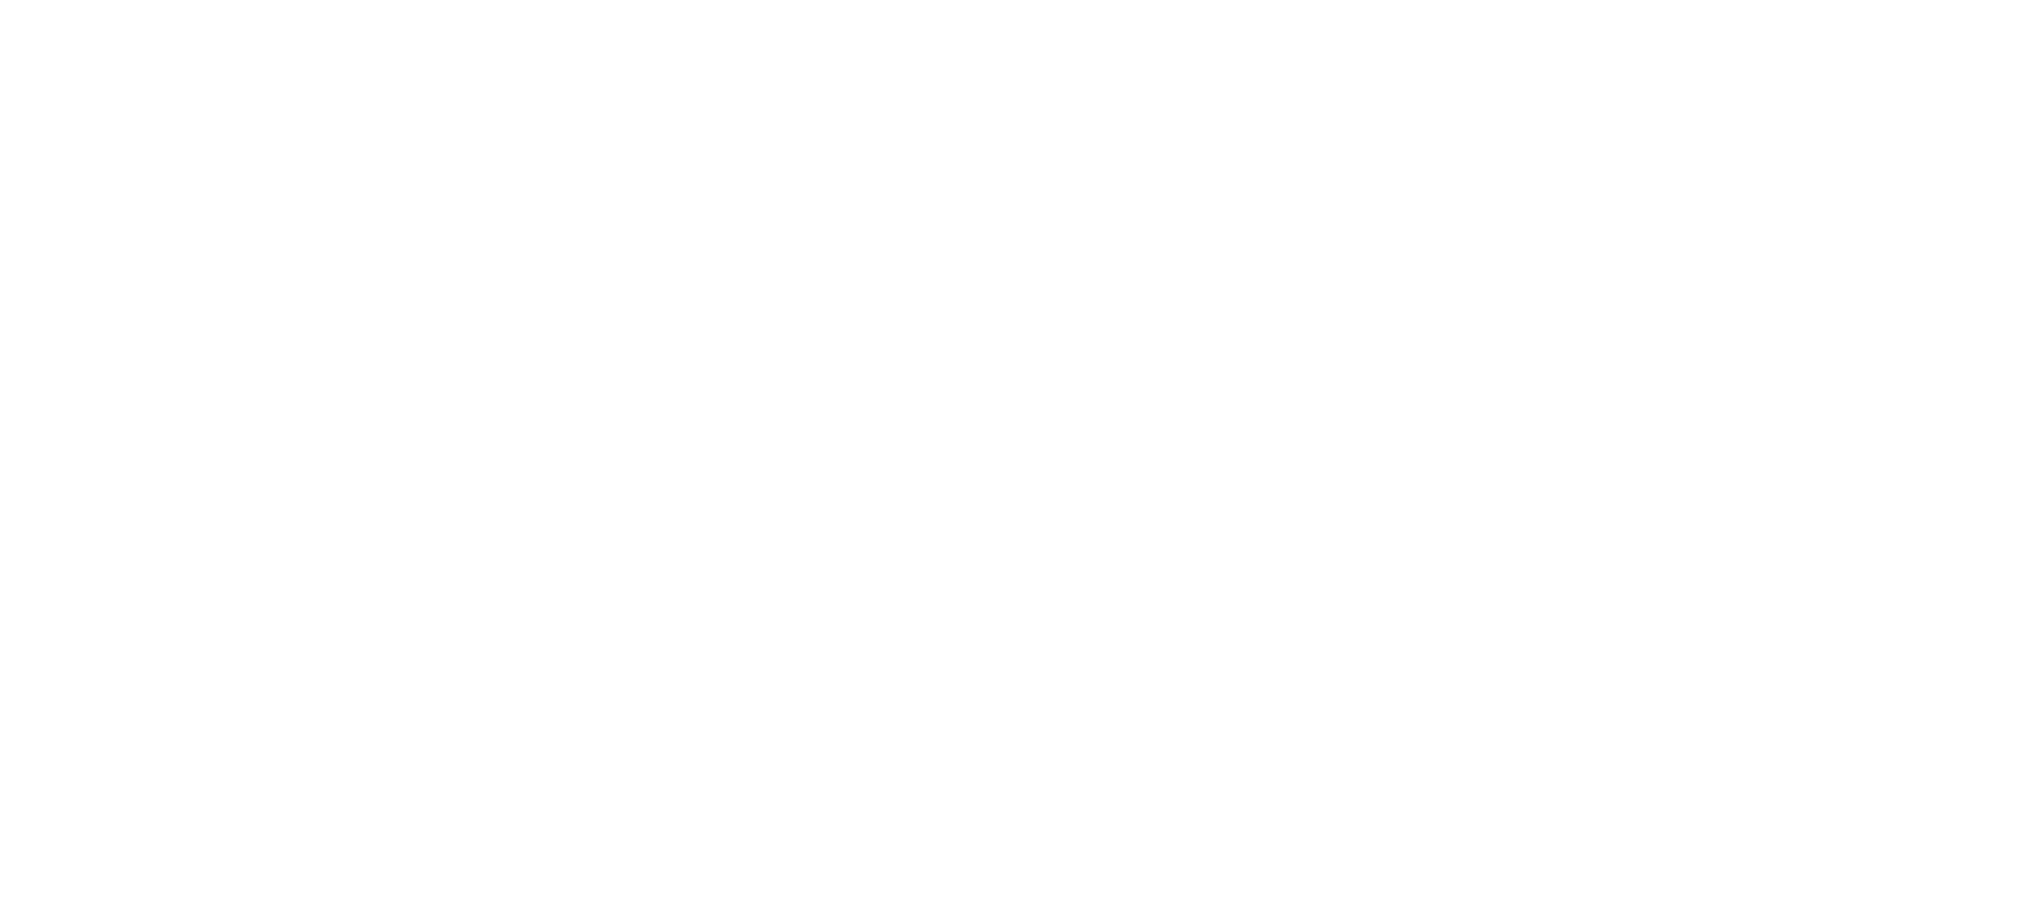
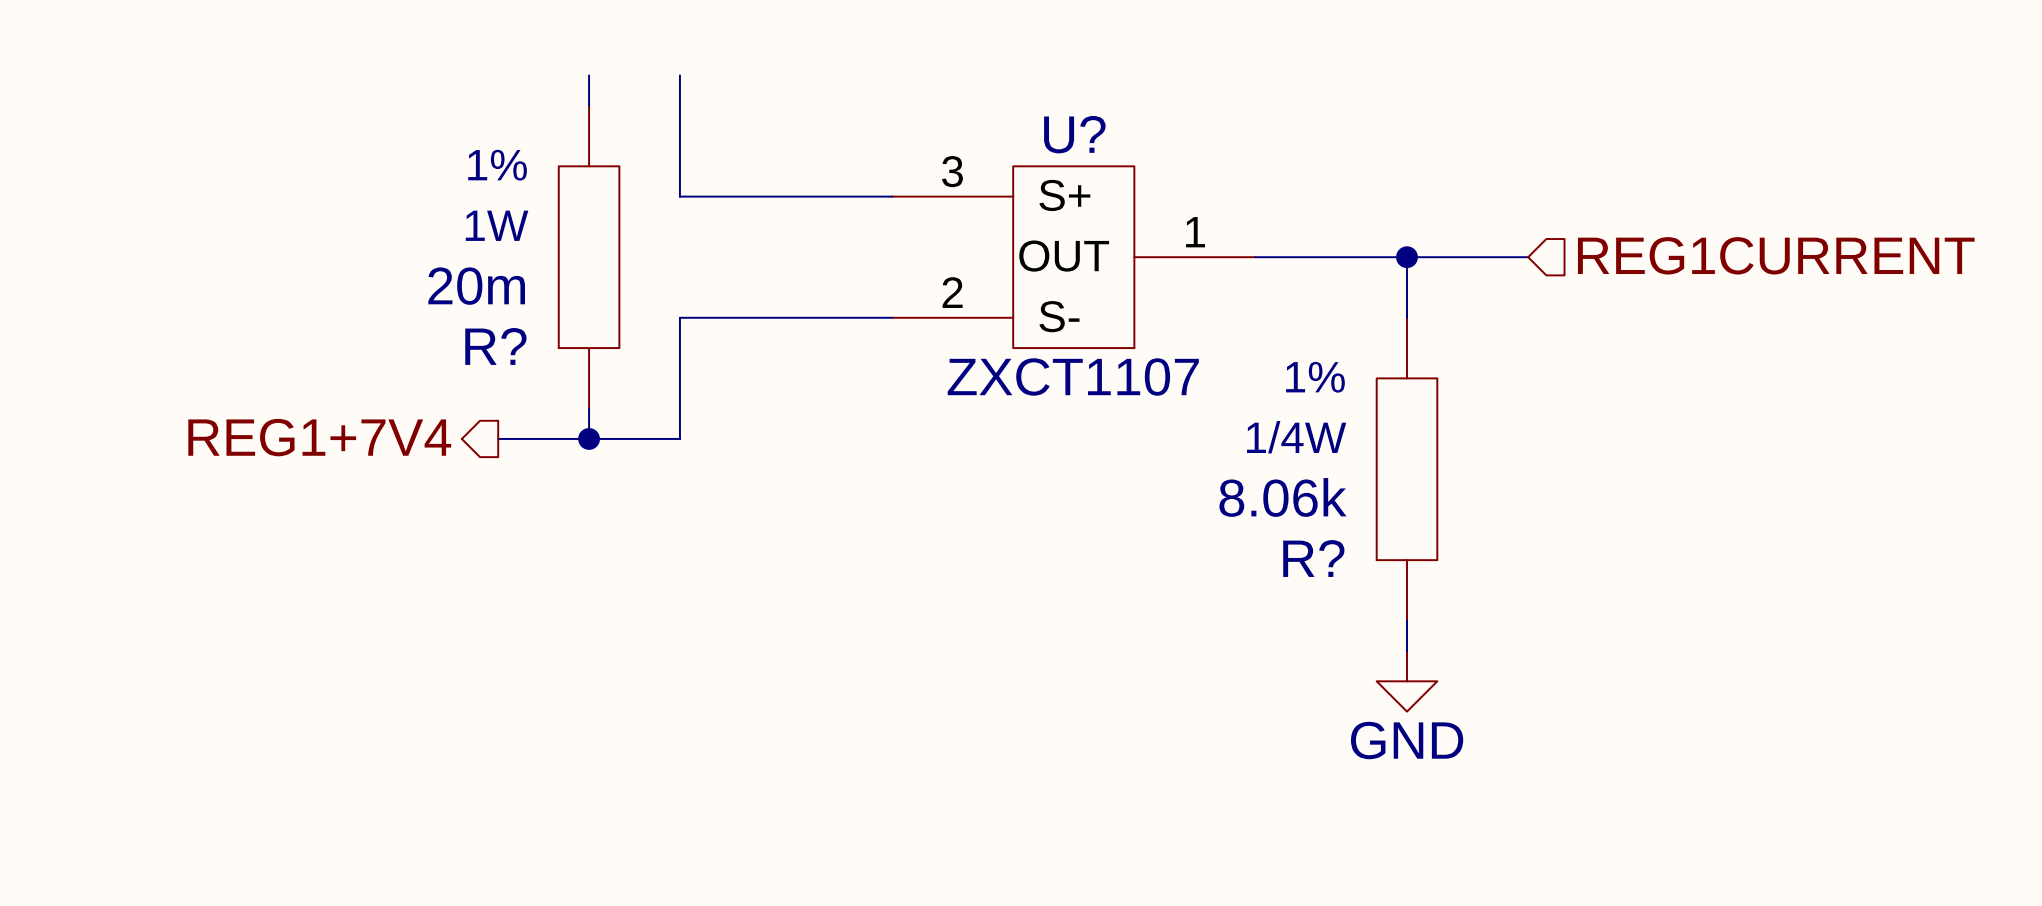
wire: none -> (589, 75) (589, 105)
wire: none -> (679, 75) (679, 196) (892, 196)
hierarchical label: none -> REG1CURRENT (1776, 255)
R?: none -> 20m (589, 257)
U?: none -> ZXCT1107 (1073, 257)
wire: none -> (1255, 257) (1528, 257)
wire: none -> (1407, 257) (1407, 317)
junction: none -> (1407, 257)
wire: none -> (892, 317) (679, 317) (679, 438) (498, 438)
wire: none -> (589, 408) (589, 438)
hierarchical label: none -> REG1+7V4 (319, 437)
junction: none -> (589, 438)
R?: none -> 8.06k (1407, 469)
wire: none -> (1407, 620) (1407, 651)
power symbol: none -> GND (1407, 681)

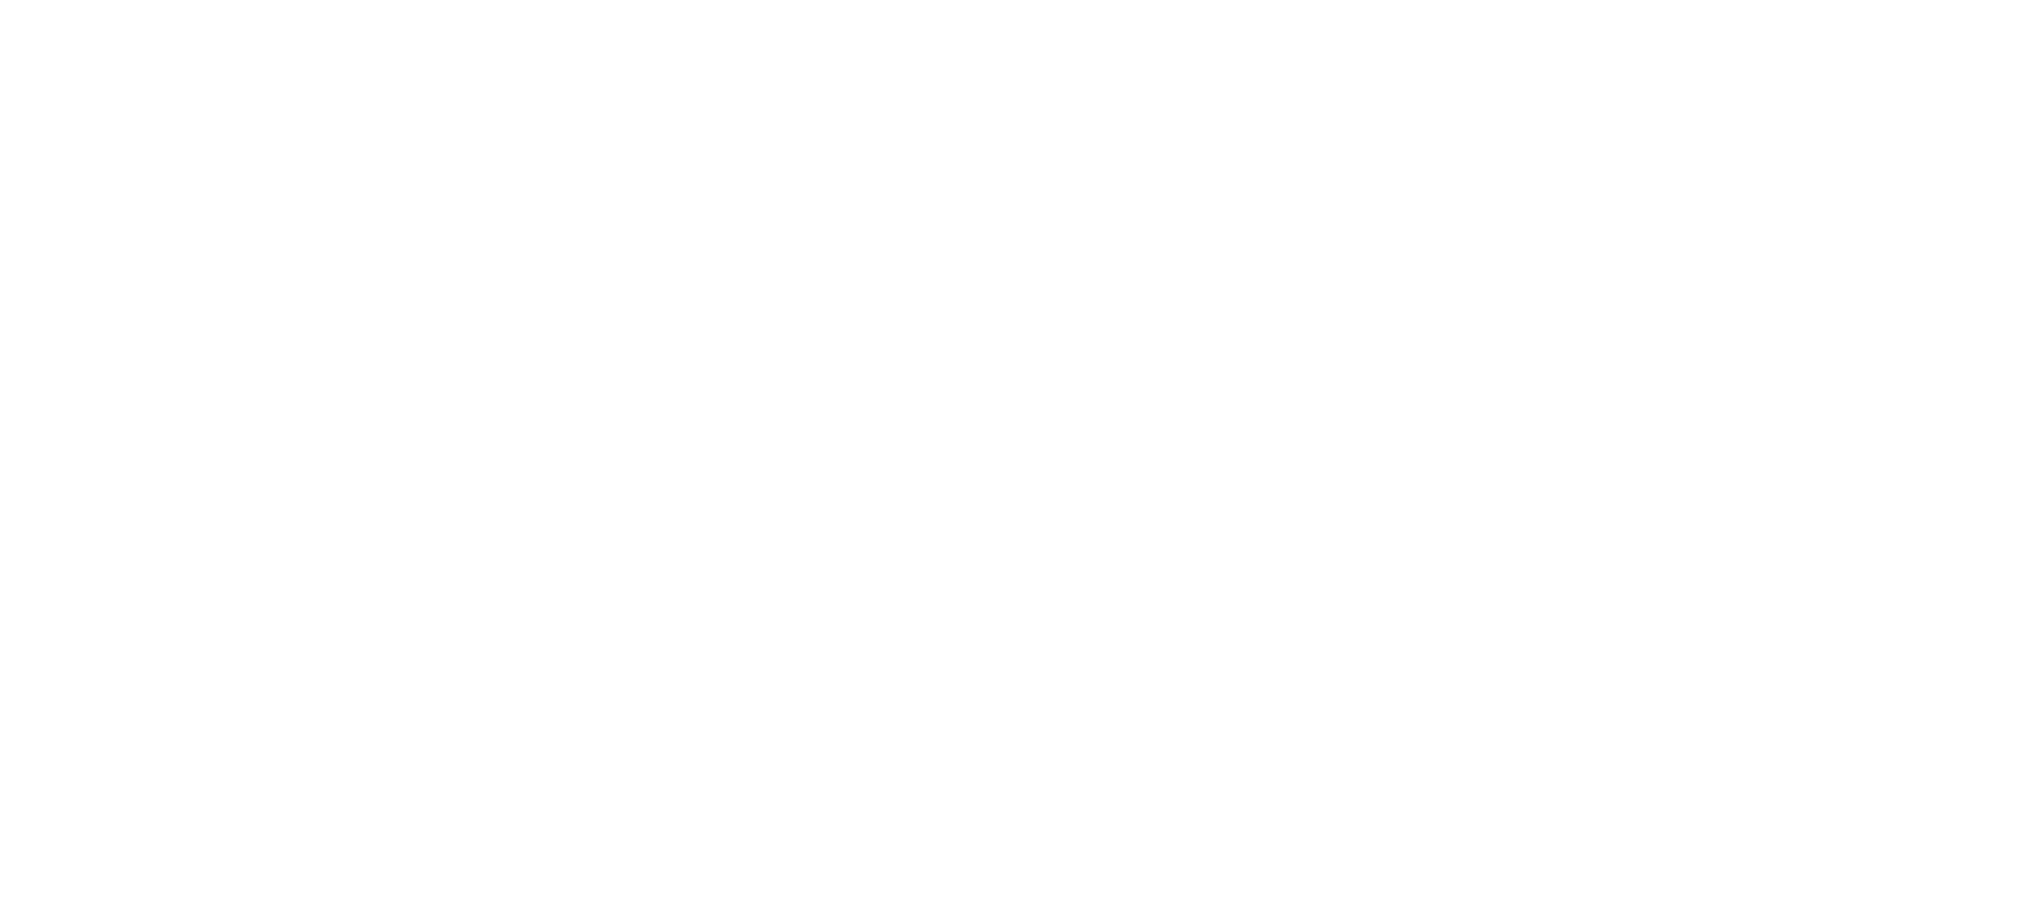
wire: (589, 75) (589, 105) -> none
wire: (679, 75) (679, 196) (892, 196) -> none
hierarchical label: REG1CURRENT (1776, 255) -> none
R?: 20m (589, 257) -> none
U?: ZXCT1107 (1073, 257) -> none
wire: (1255, 257) (1528, 257) -> none
wire: (1407, 257) (1407, 317) -> none
junction: (1407, 257) -> none
wire: (892, 317) (679, 317) (679, 438) (498, 438) -> none
wire: (589, 408) (589, 438) -> none
hierarchical label: REG1+7V4 (319, 437) -> none
junction: (589, 438) -> none
R?: 8.06k (1407, 469) -> none
wire: (1407, 620) (1407, 651) -> none
power symbol: GND (1407, 681) -> none

